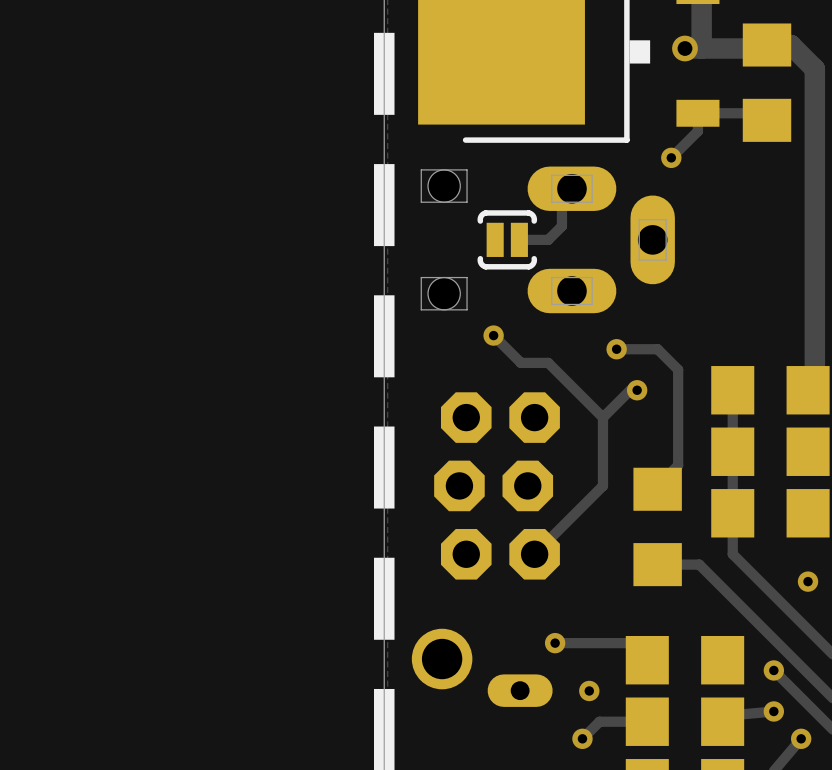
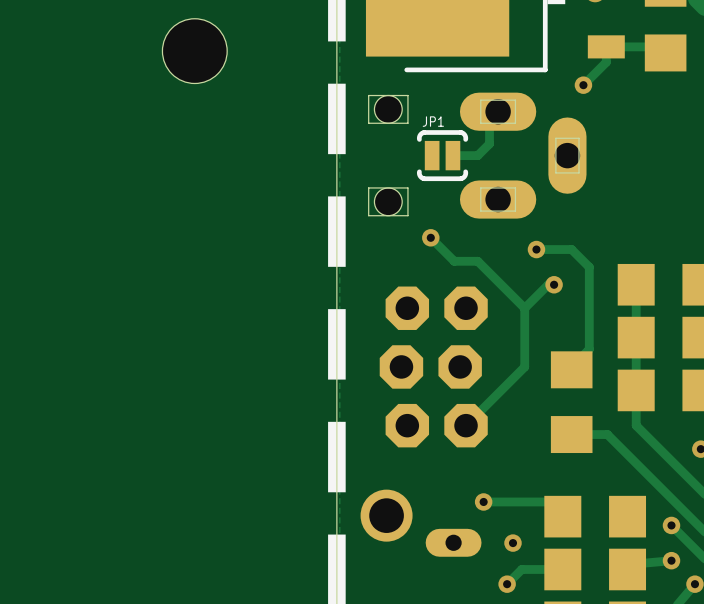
part: none -> (194, 51)
JP1 name: none -> JP1 (433, 121)

